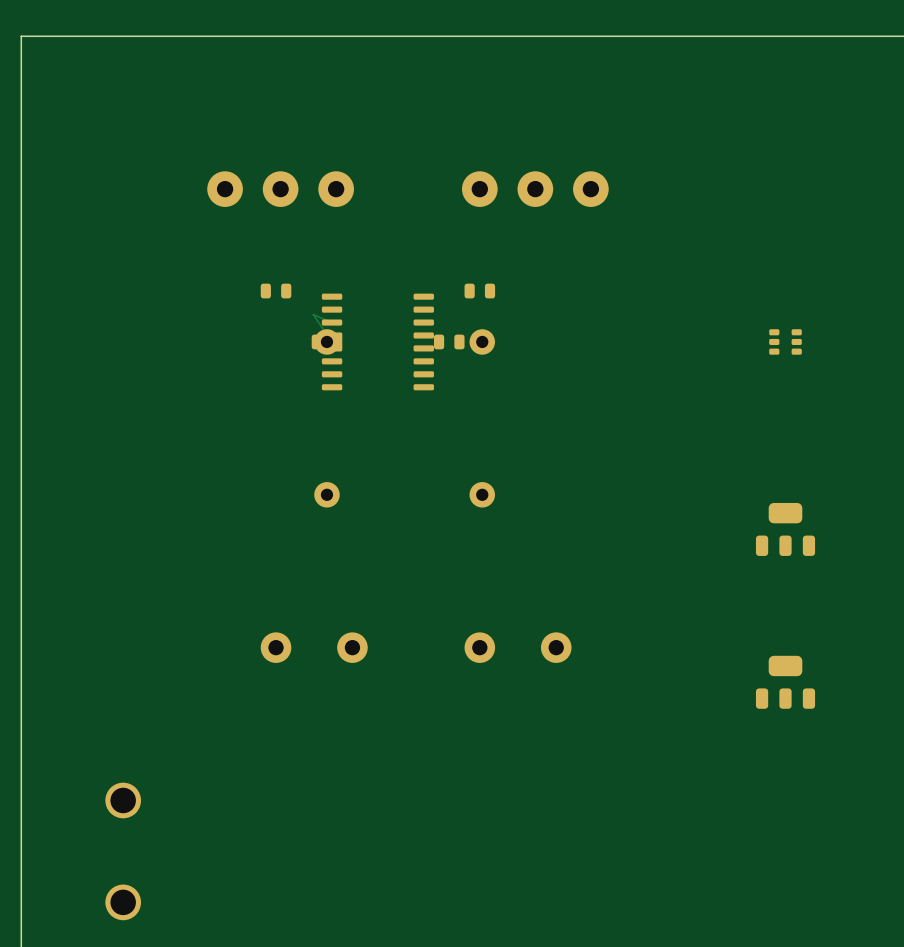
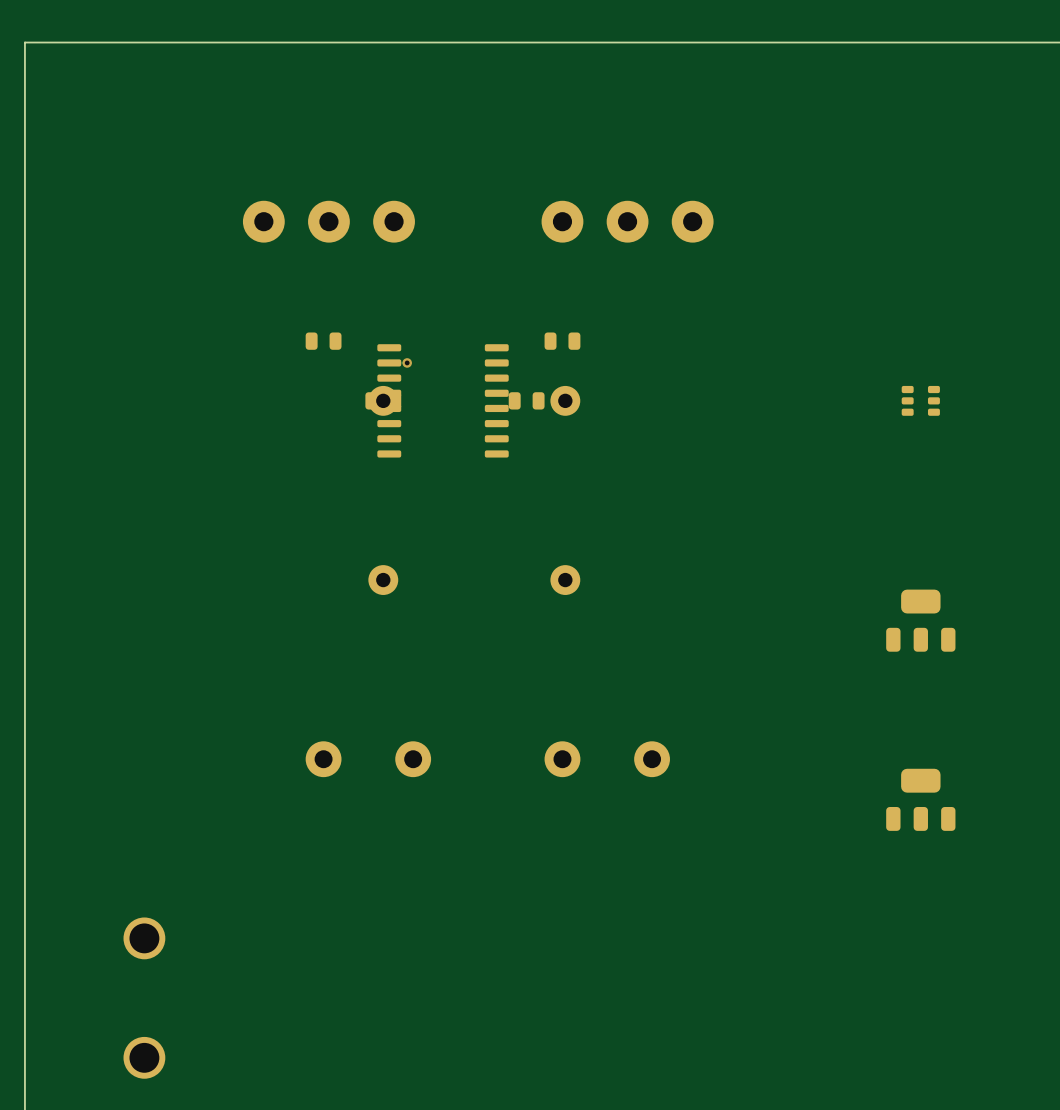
via: none -> (407, 362)
track: (332, 322) (313, 314) (324, 331) -> none

